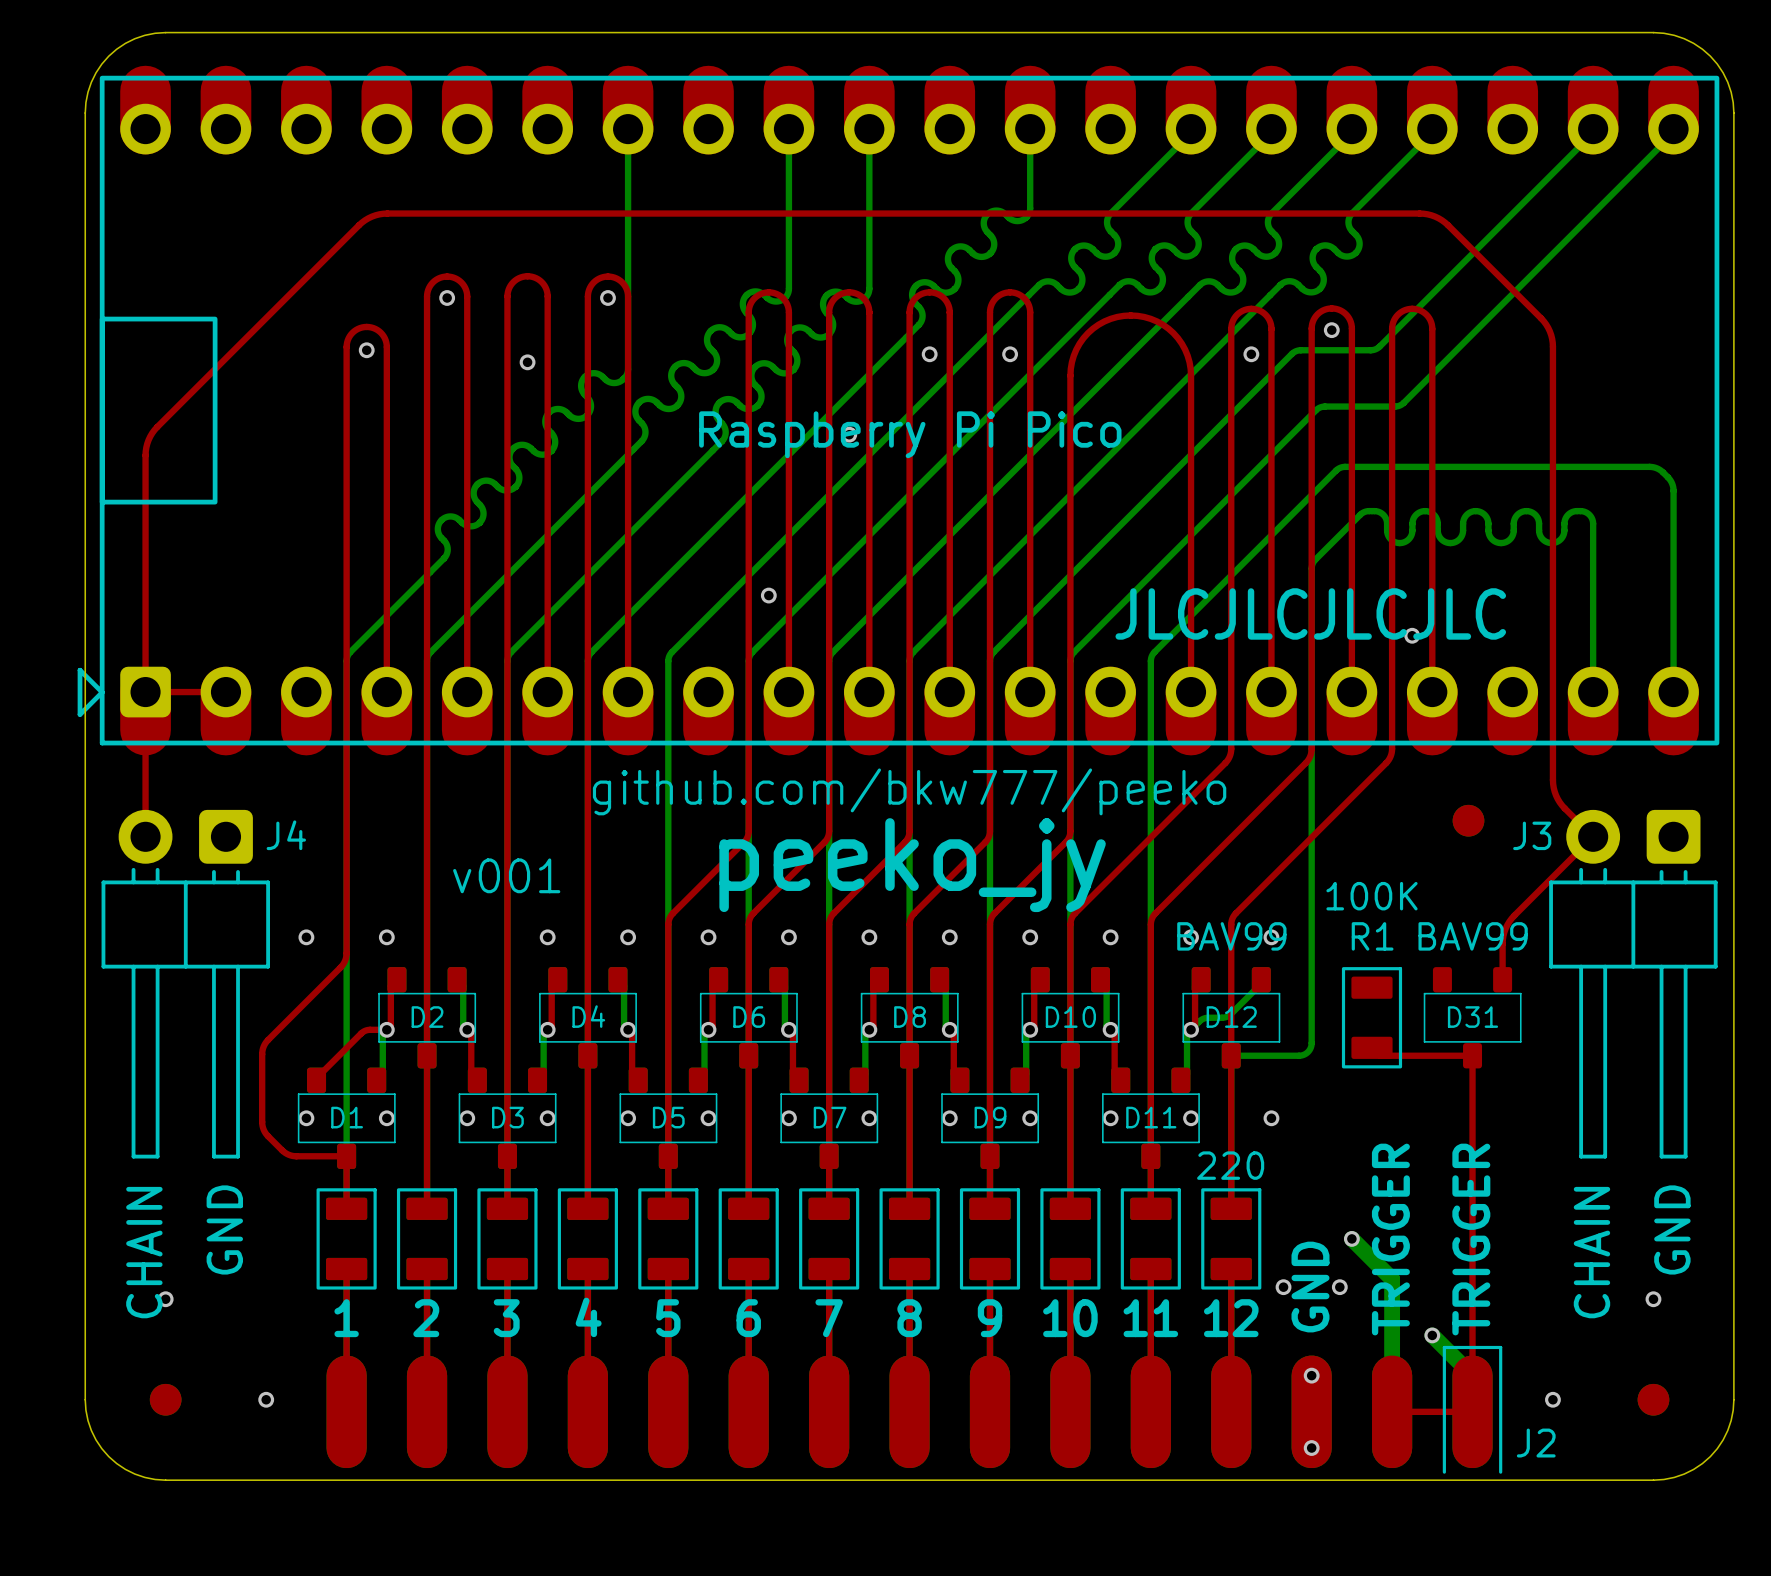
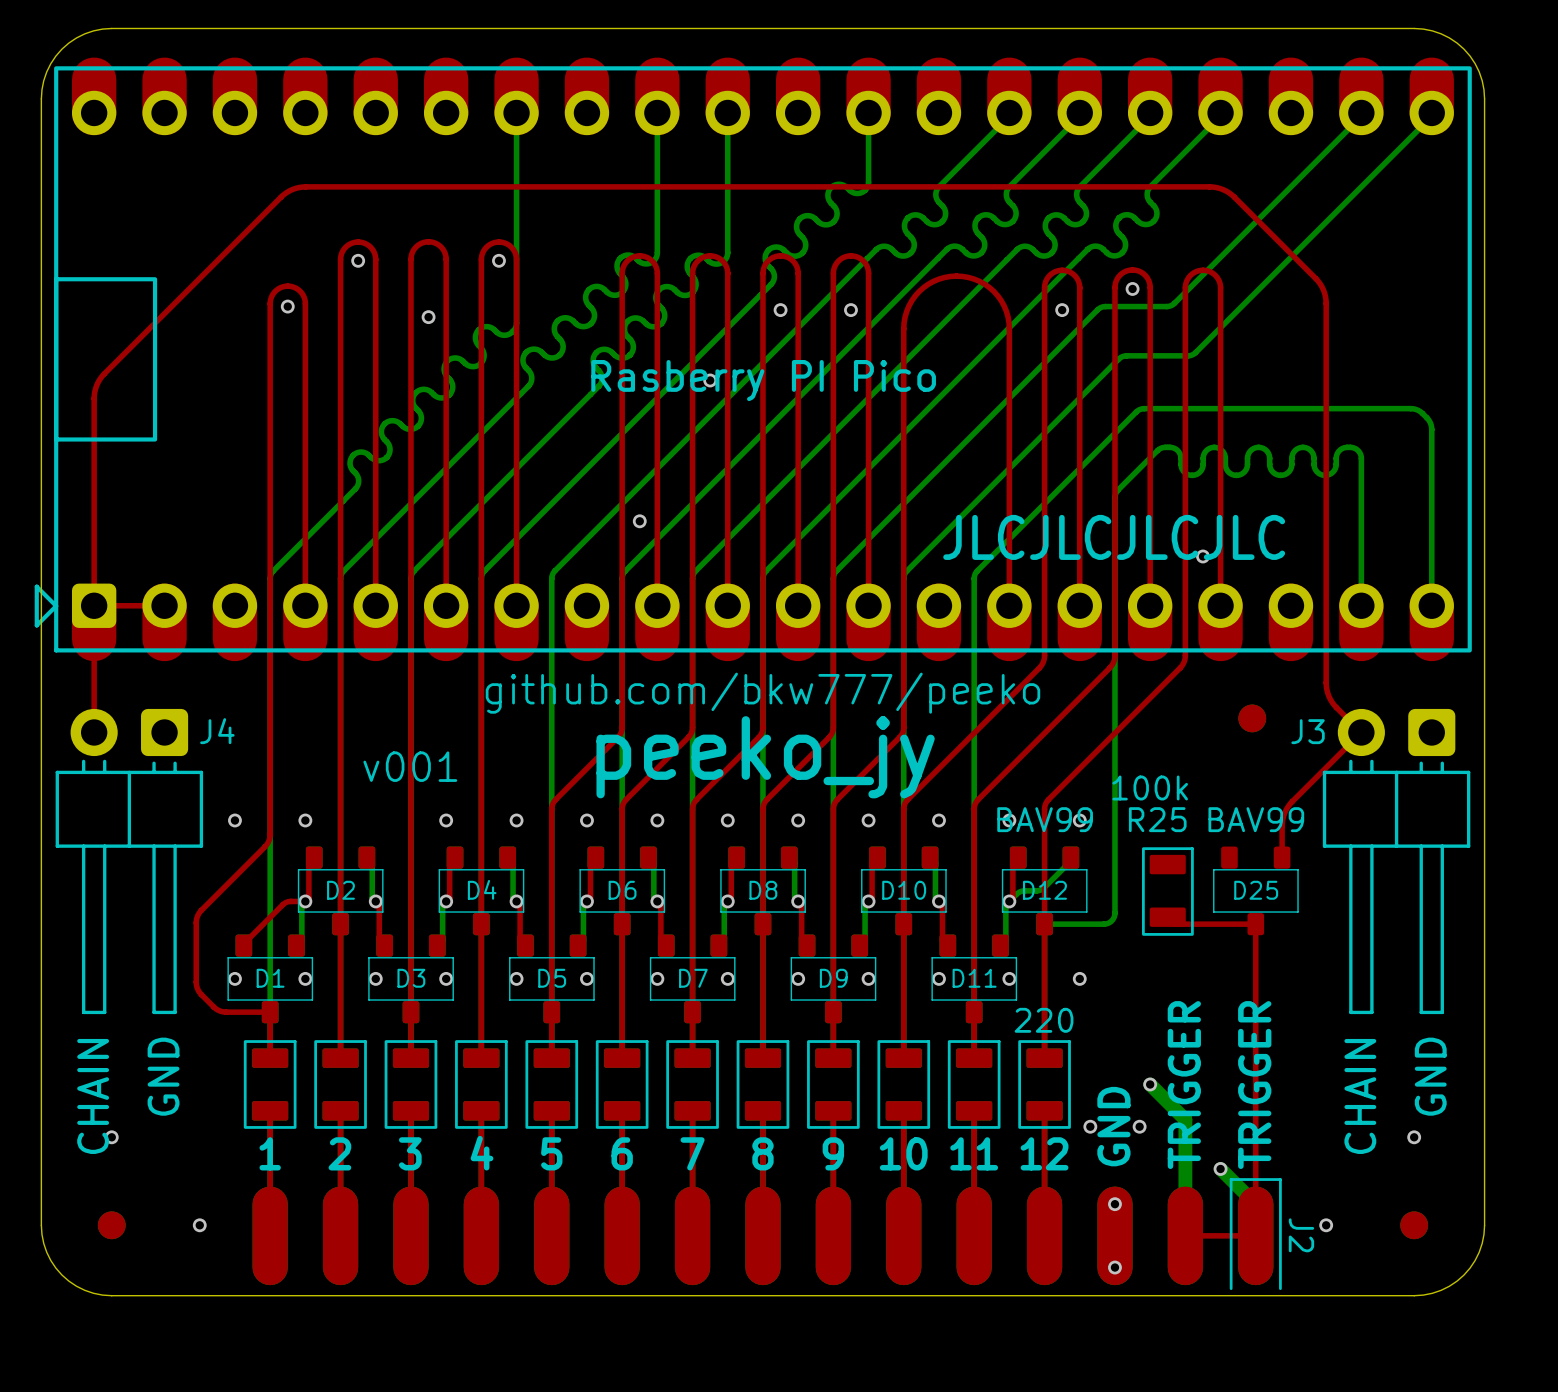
part value: Raspberry Pi Pico (910, 434) -> Rasberry PI Pico (763, 380)
R1: 100K (1371, 1017) -> none
D31 name: D31 (1472, 1017) -> D25 (1256, 890)
R25: none -> 100k (1167, 891)
J2 name rotation: 0° (1536, 1443) -> 90° clockwise (1301, 1235)

